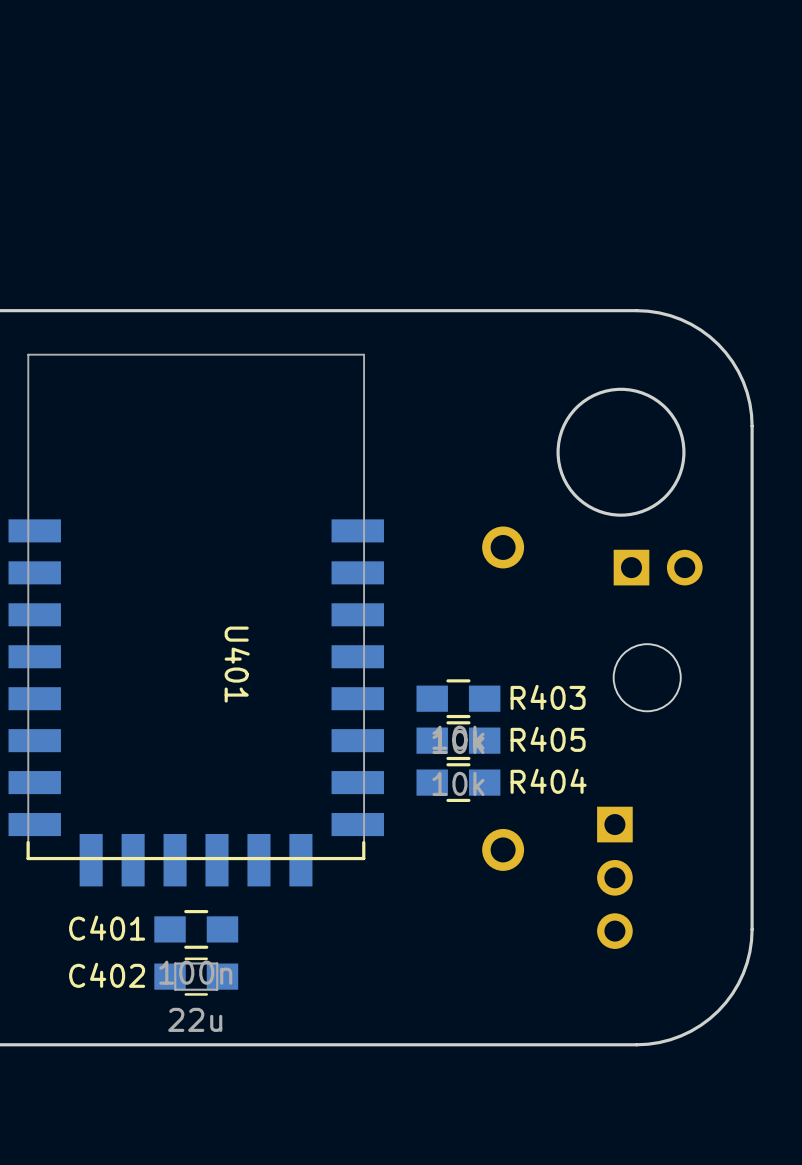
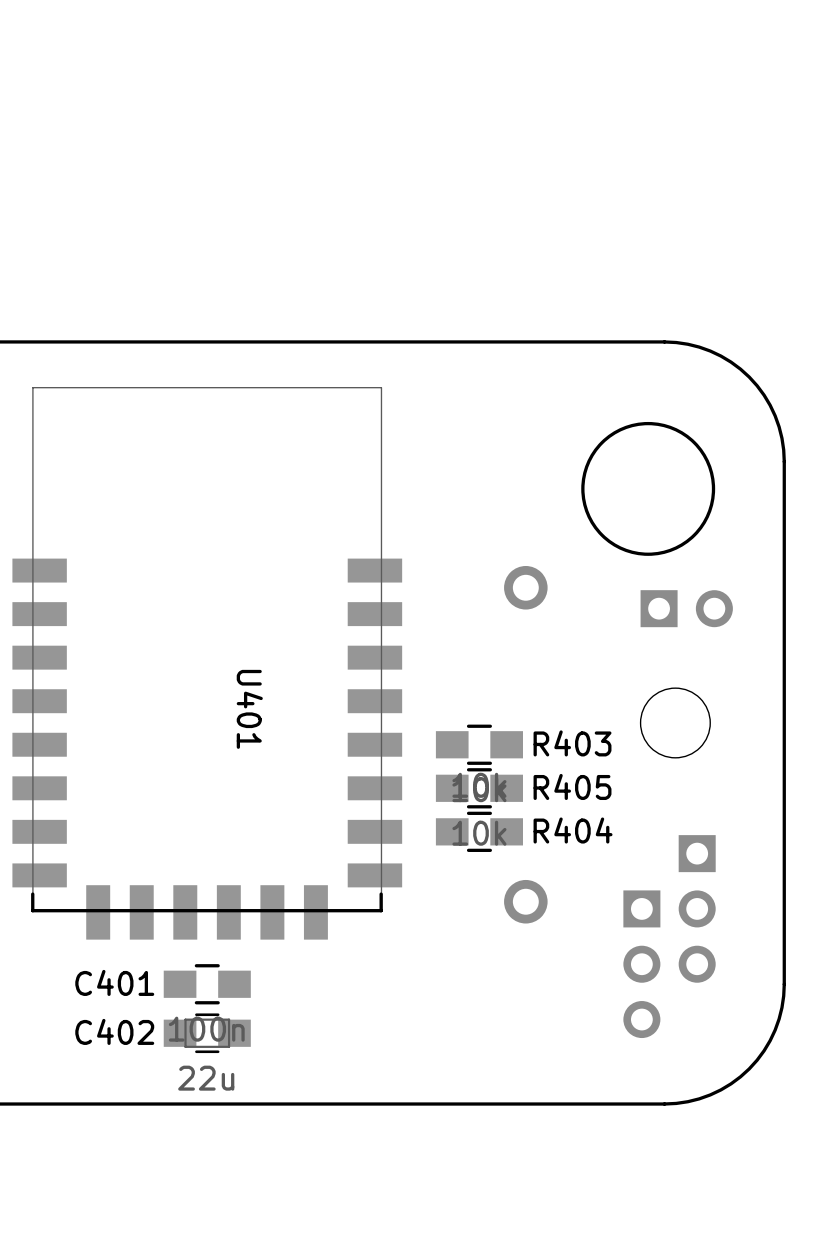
part: none -> (697, 908)
part: (614, 877) -> none
part: none -> (641, 964)

